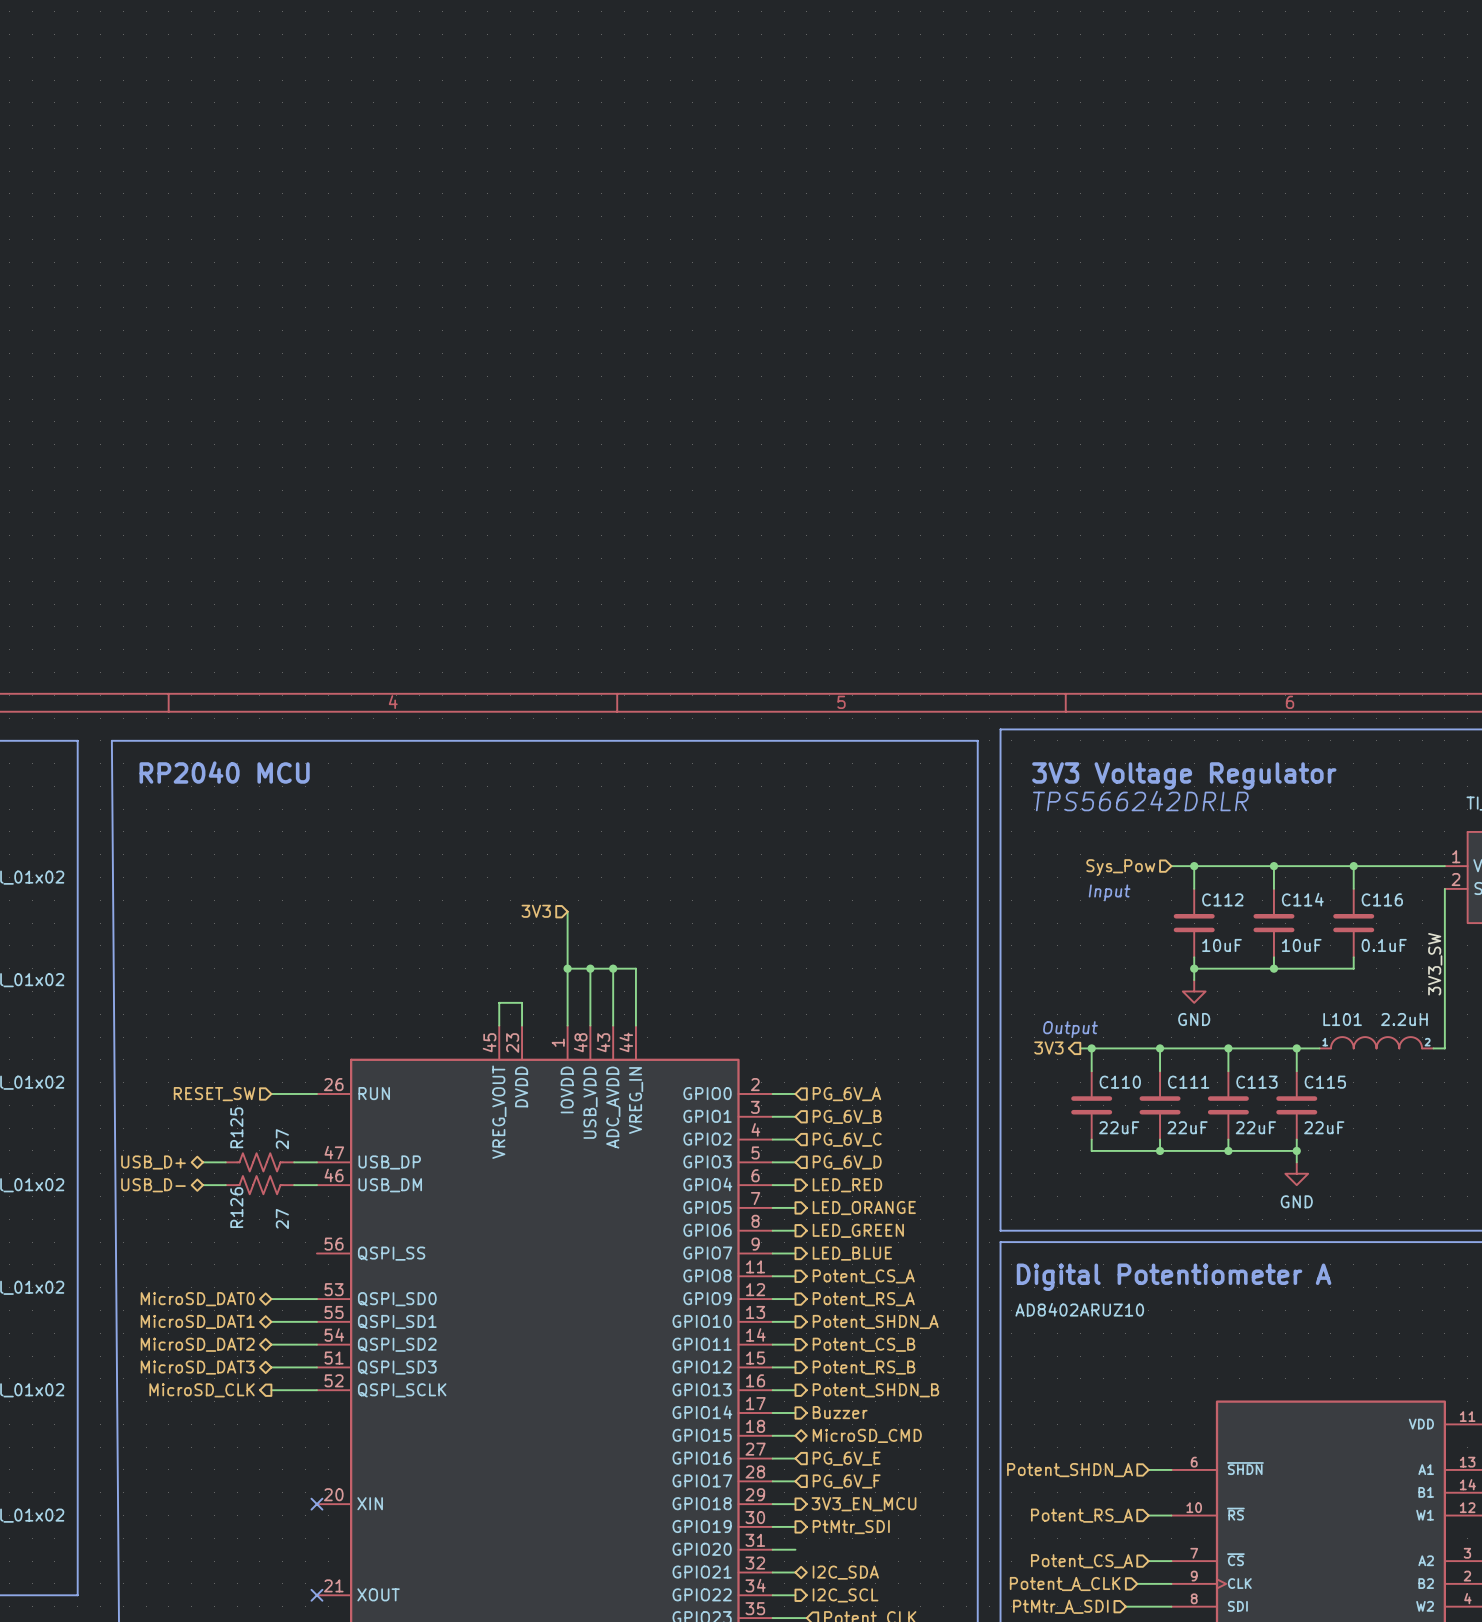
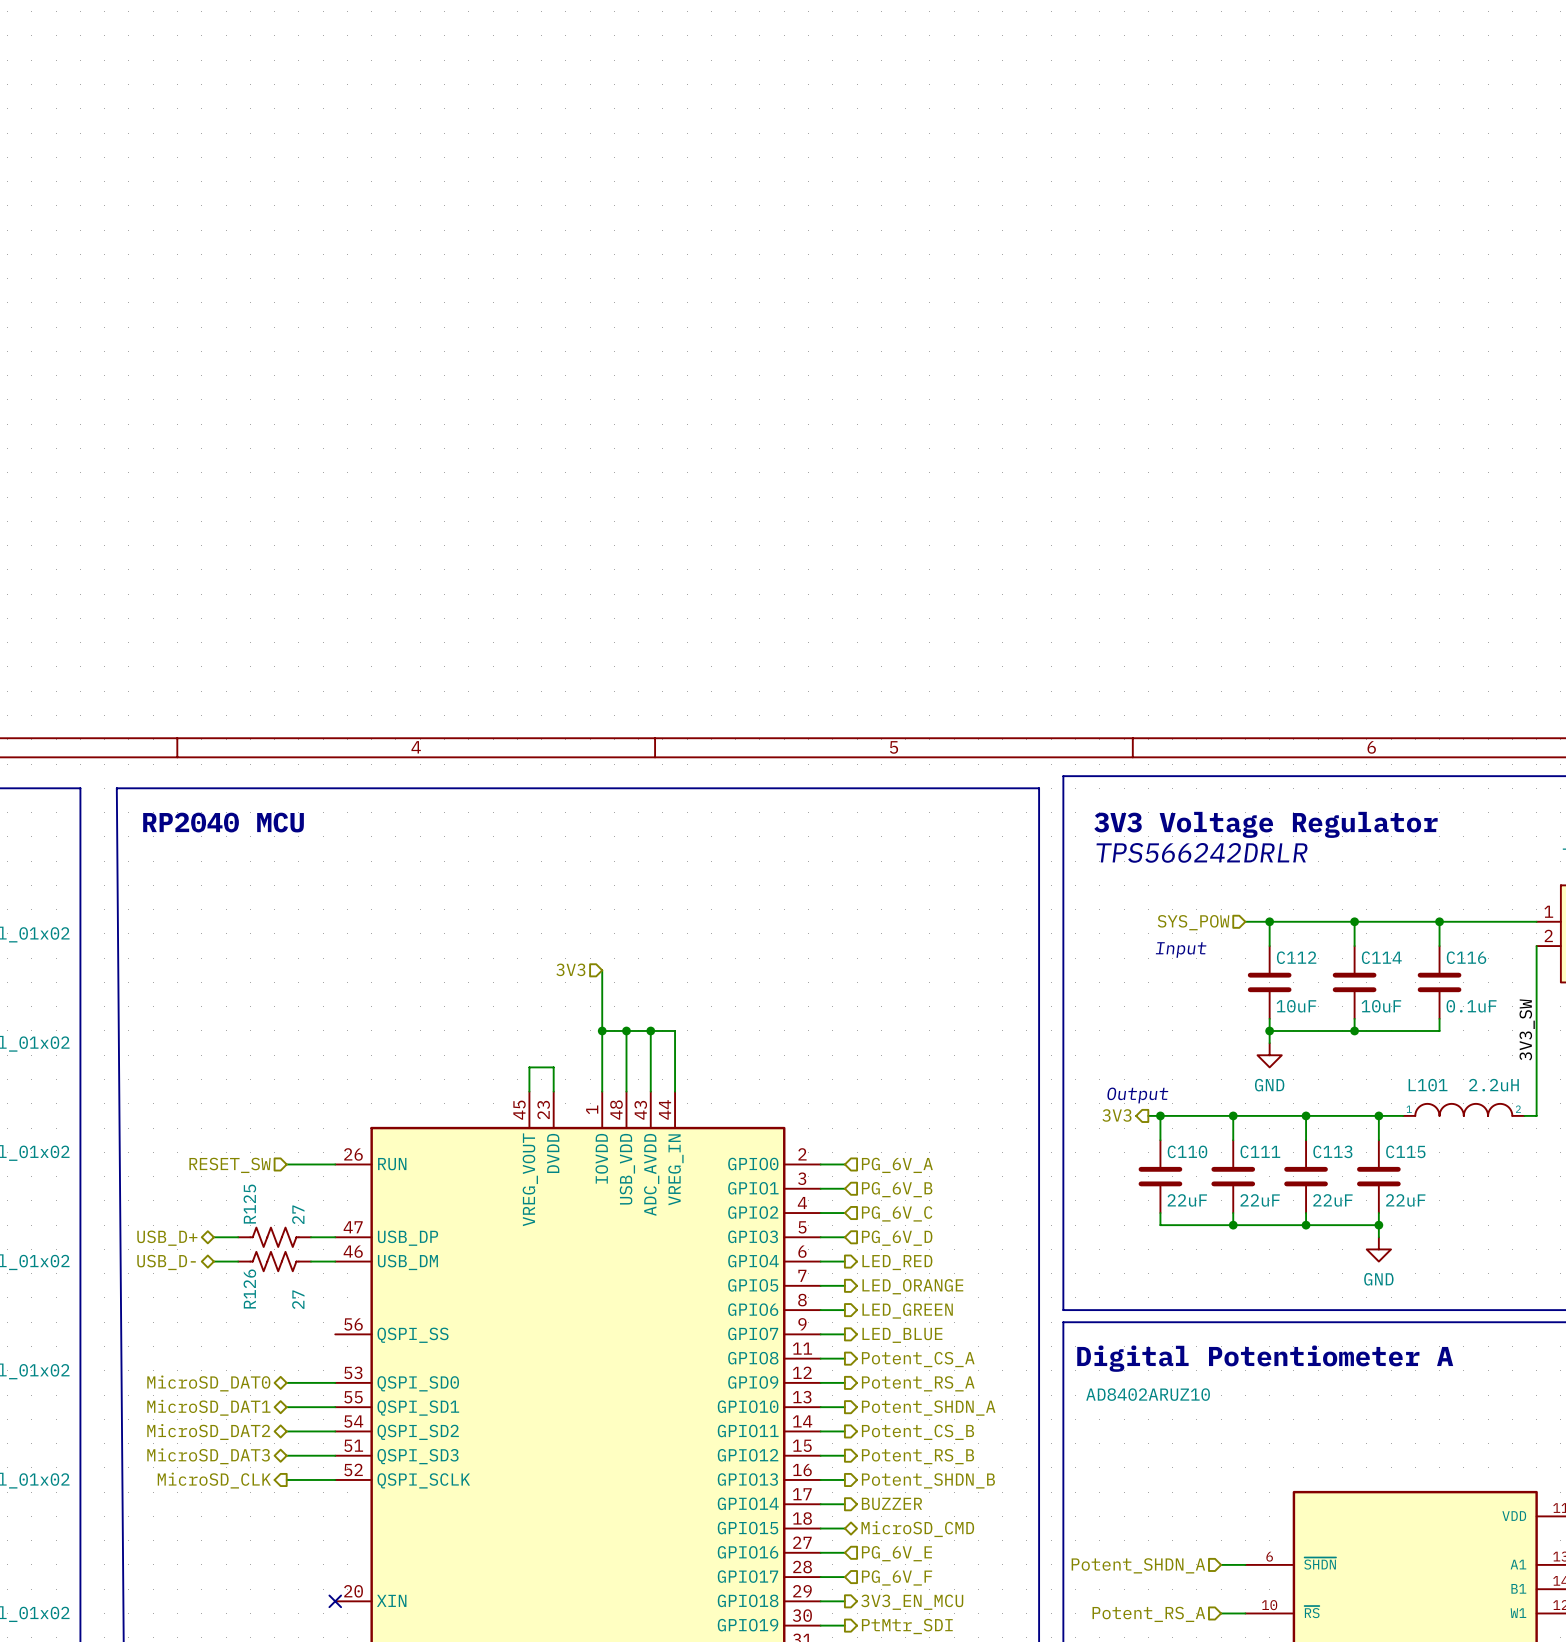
hierarchical label: Sys_Pow (1120, 867) -> SYS_POW (1193, 922)
hierarchical label: Buzzer (840, 1412) -> BUZZER (891, 1503)

